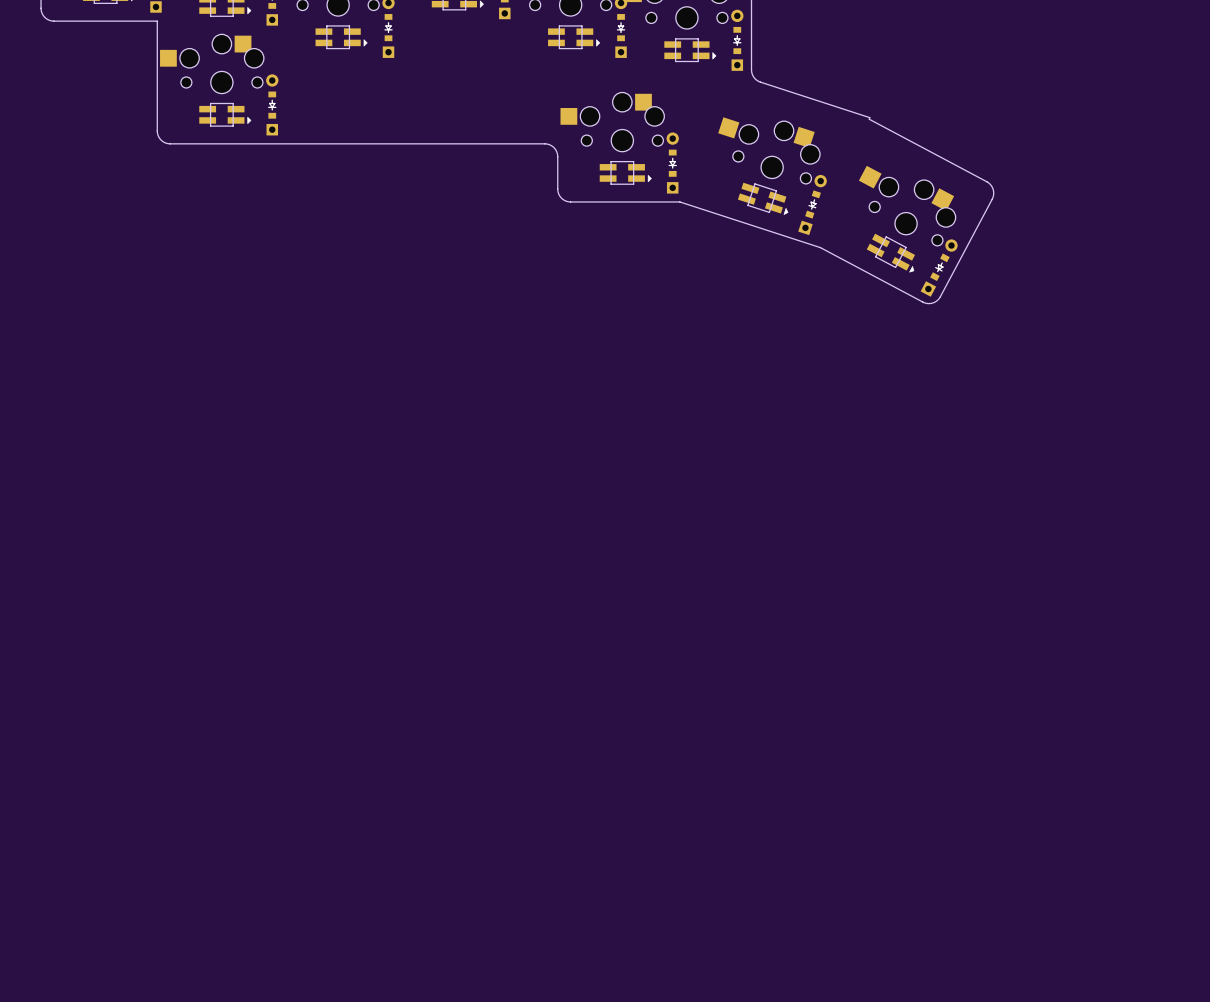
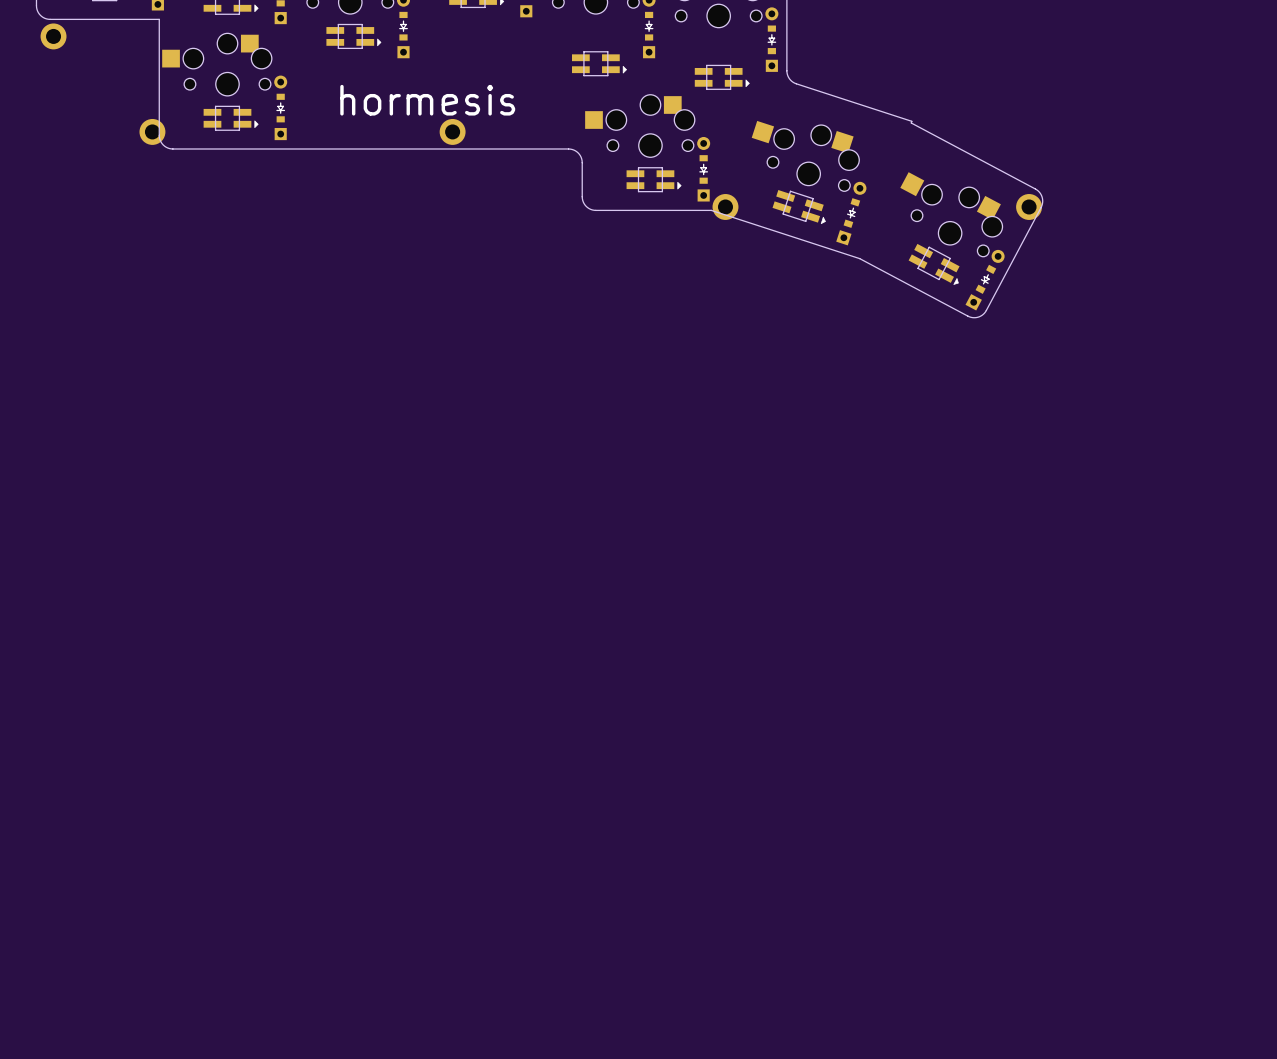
part: none -> (53, 36)
part position: (574, 37) -> (599, 63)
part position: (690, 50) -> (722, 77)
text: none -> hormesis (427, 100)
part: none -> (152, 131)
part: none -> (452, 131)
part: none -> (725, 206)
part: none -> (1029, 206)

